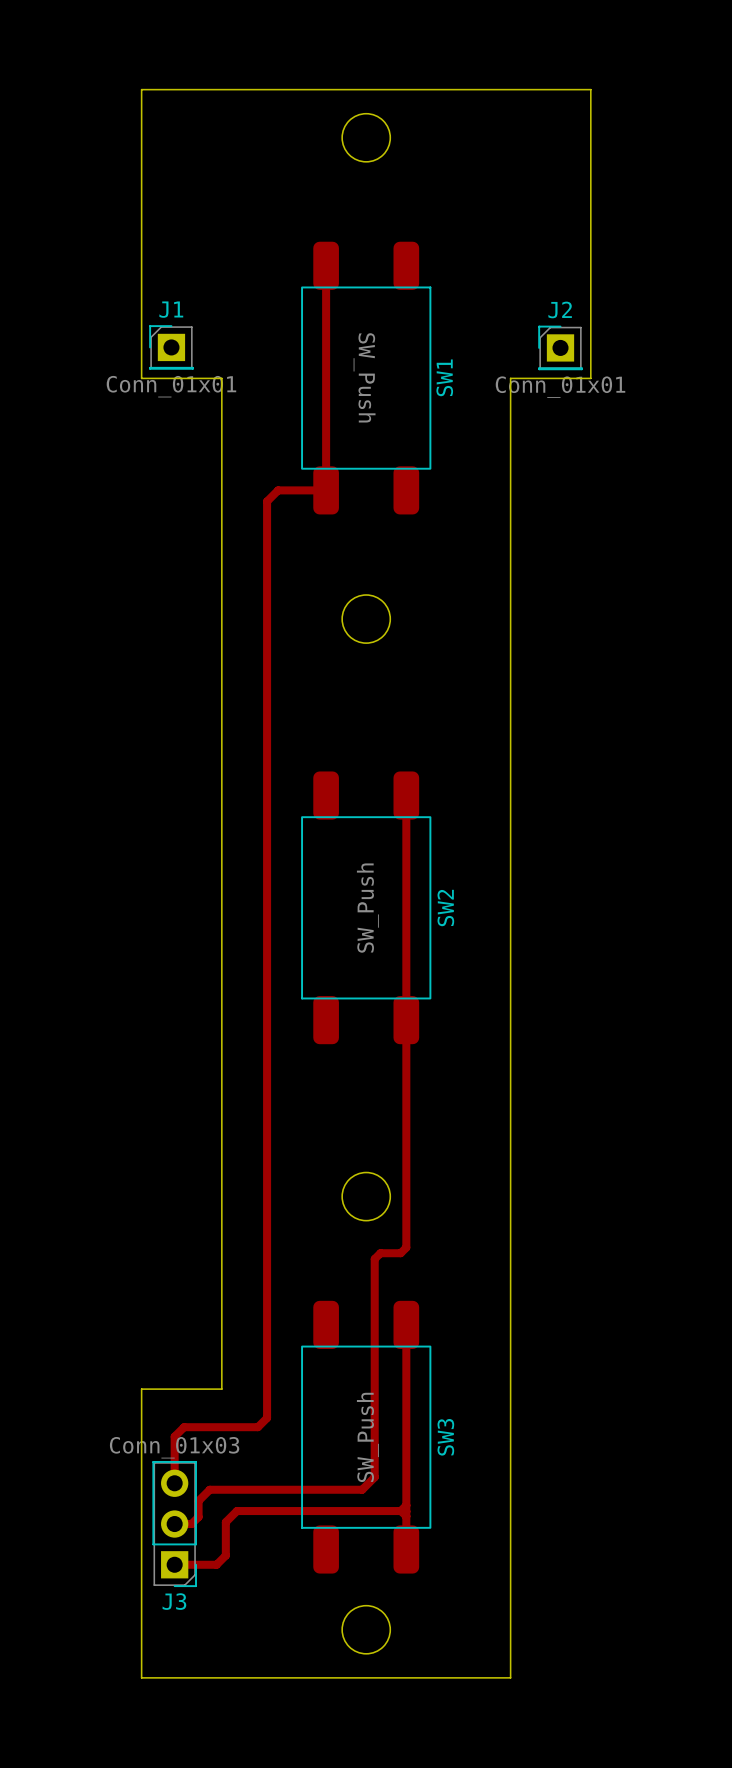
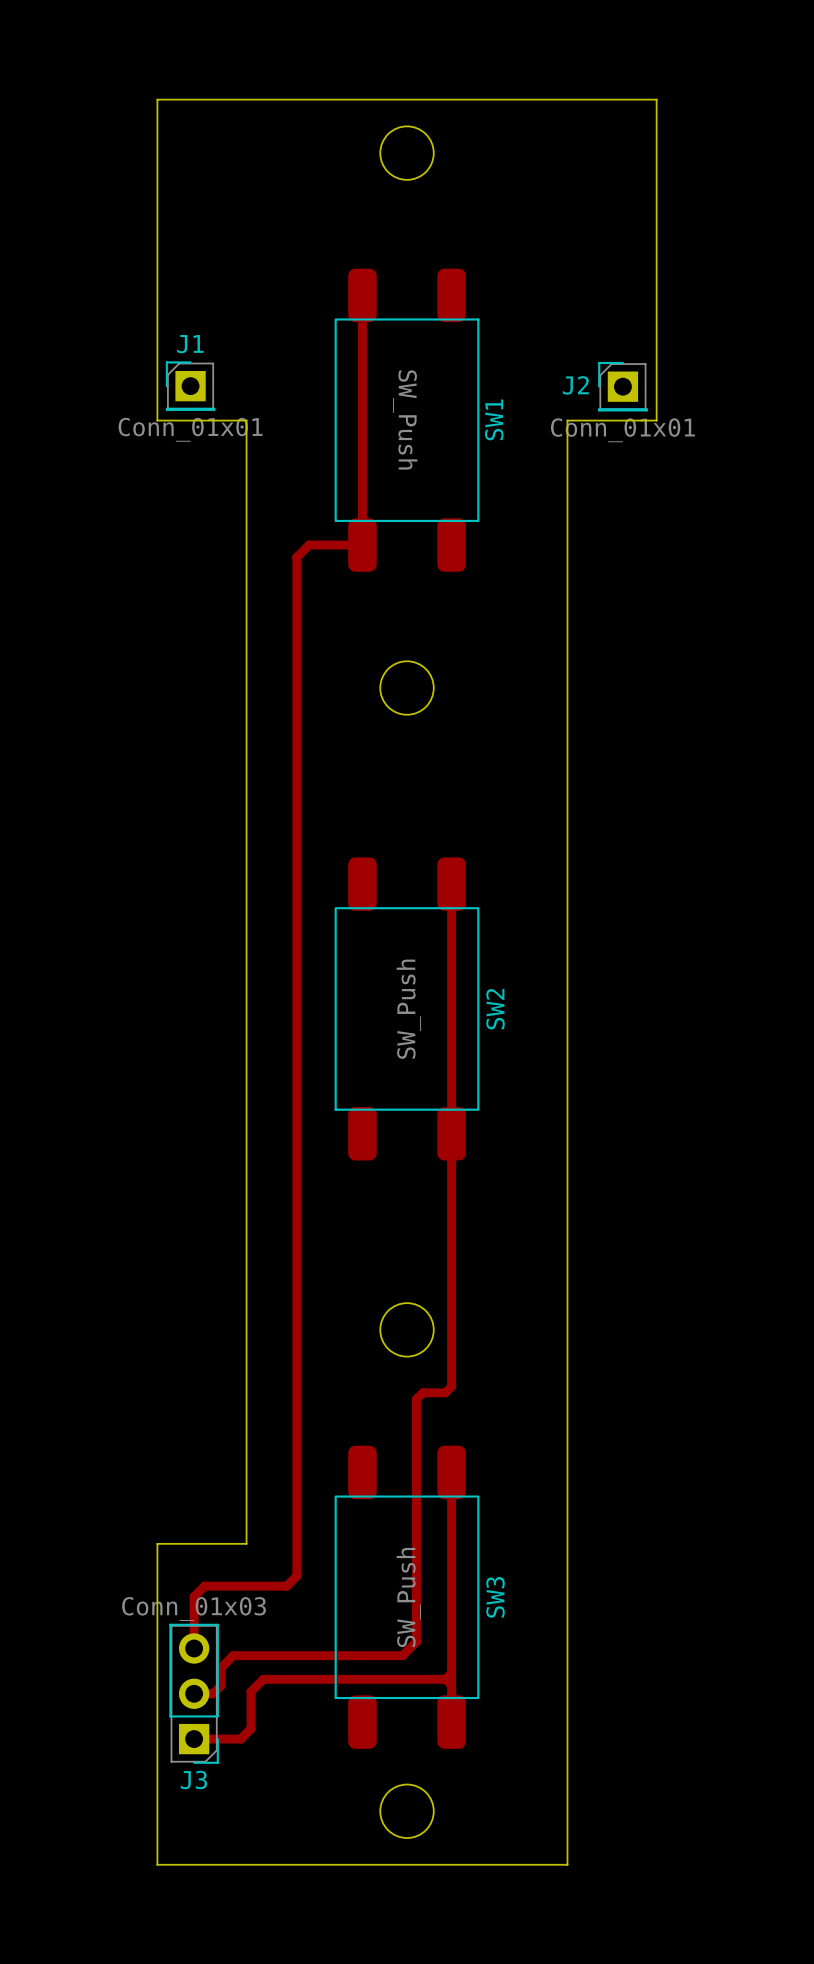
J2 name position: J2 (560, 309) -> J2 (575, 385)

